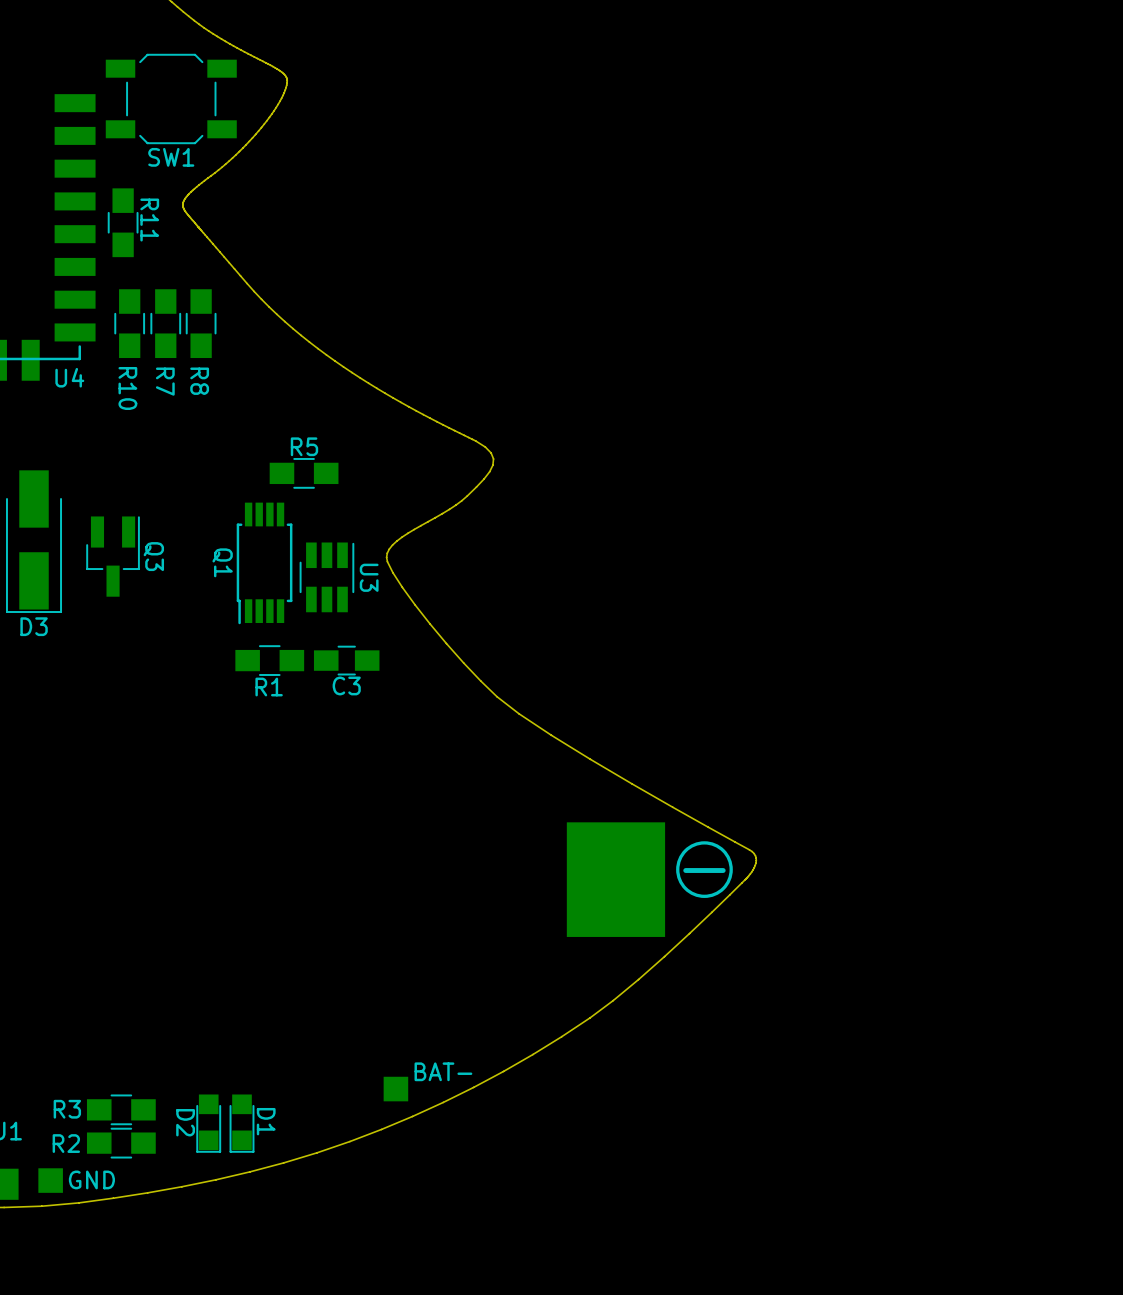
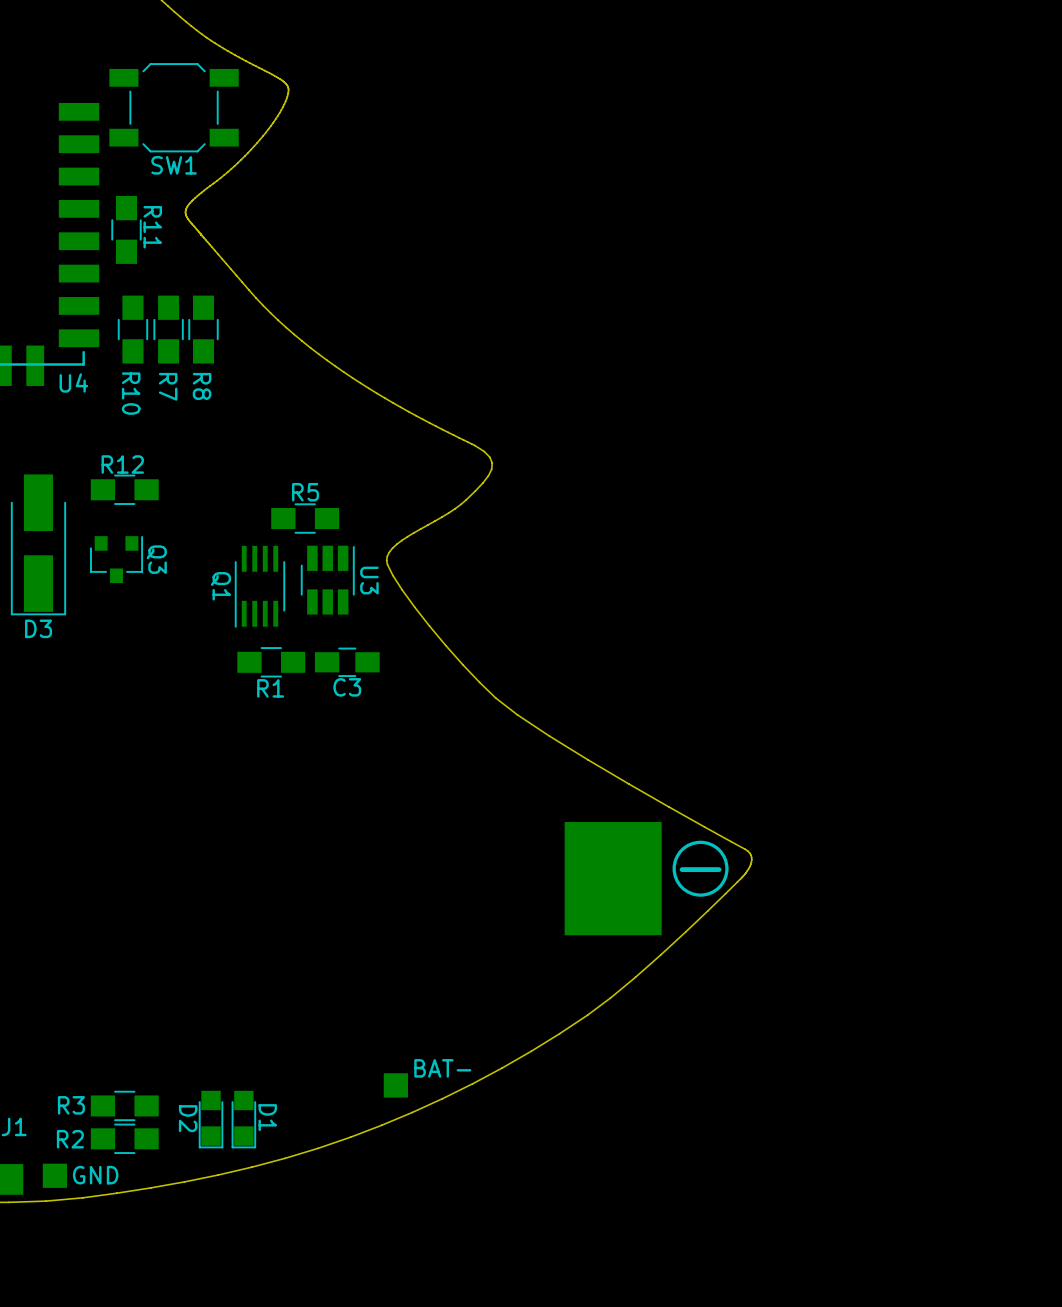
R5 position: (304, 473) -> (305, 518)
R12: none -> (124, 489)
Q1 footprint: [236, 502, 293, 625] -> [234, 545, 286, 628]
Q3 footprint: [86, 516, 140, 597] -> [90, 535, 144, 584]

